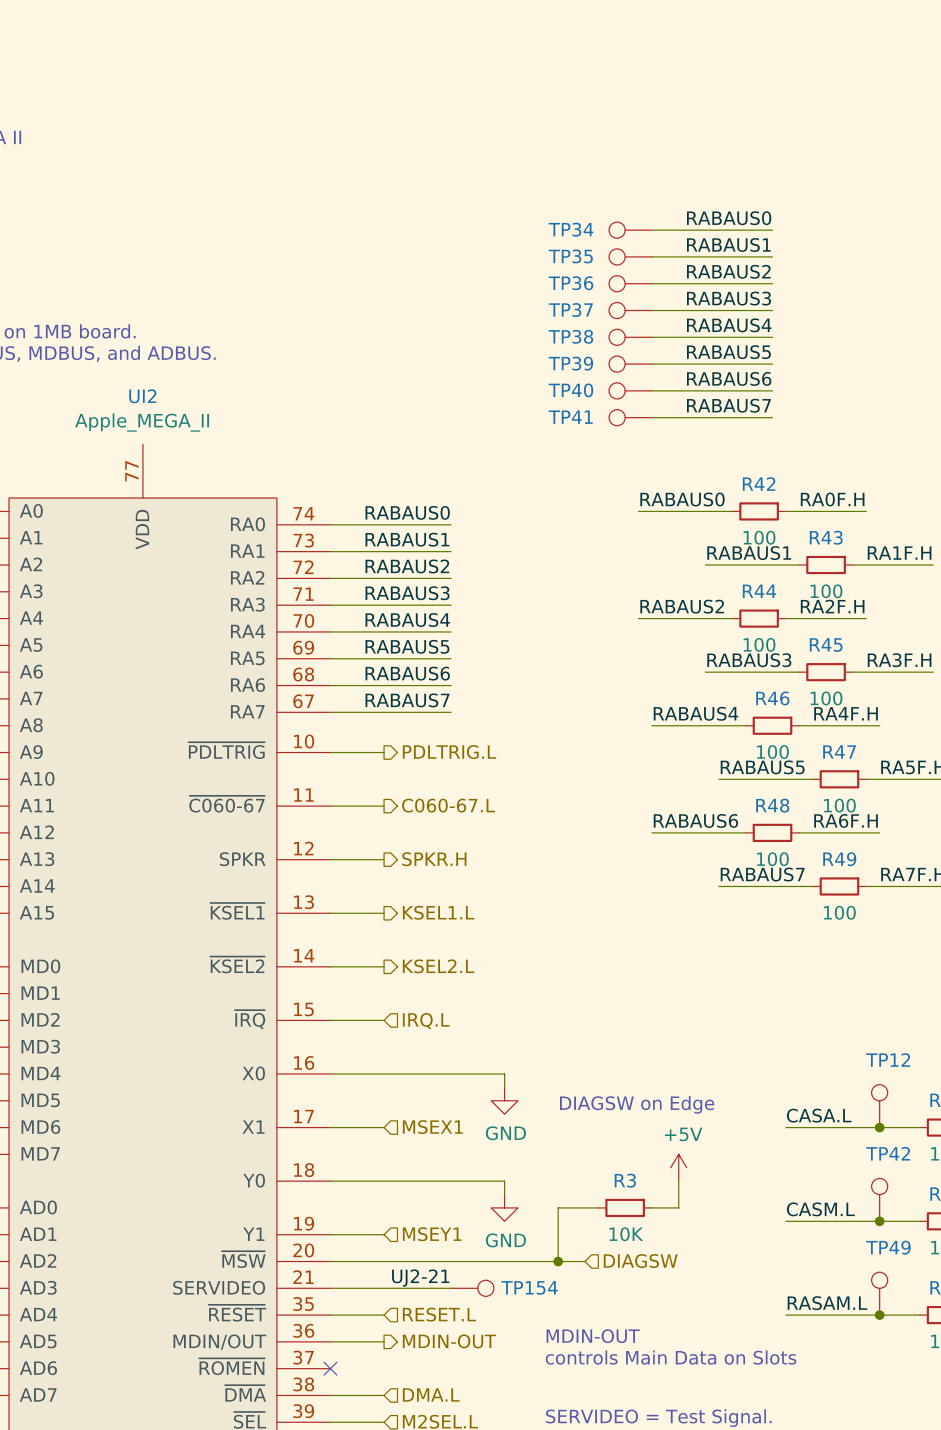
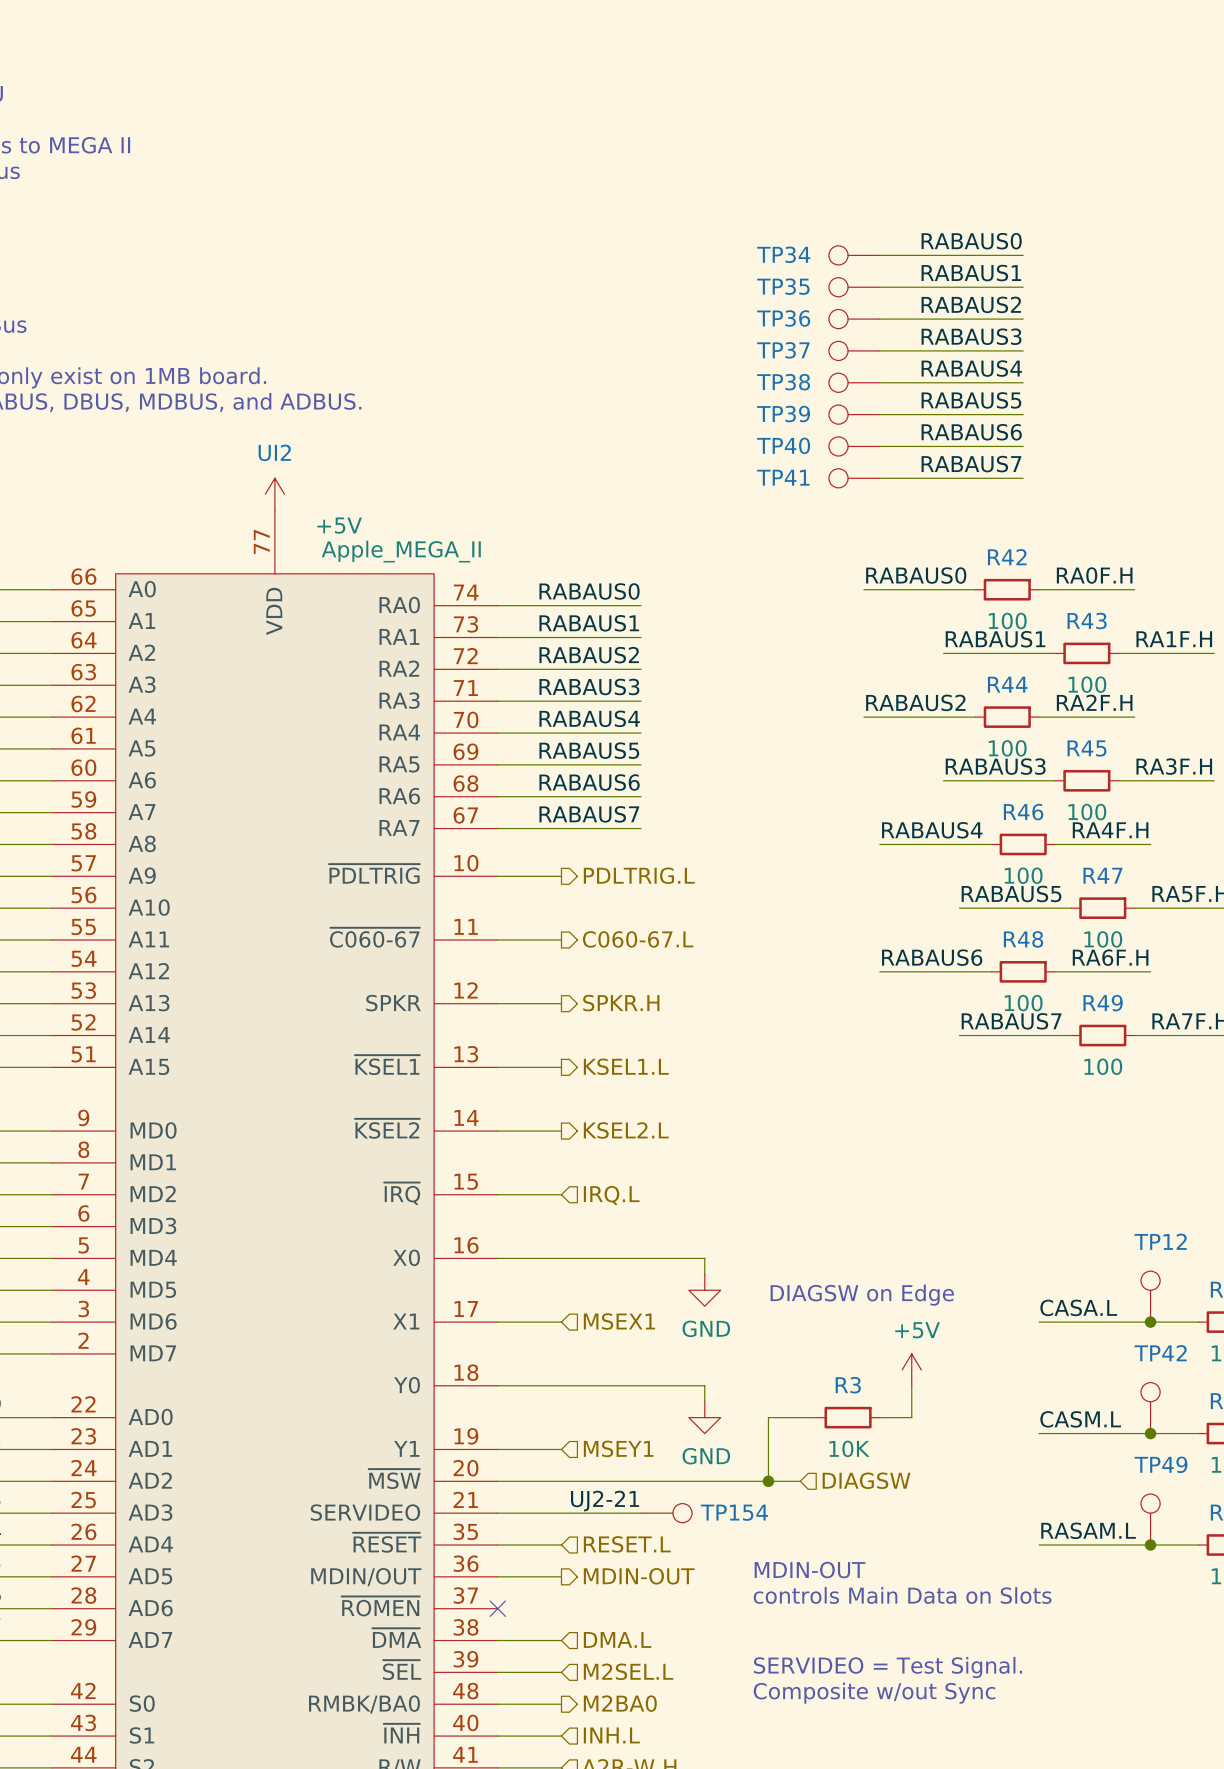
UI2 value position: Apple_MEGA_II (142, 422) -> Apple_MEGA_II (401, 551)
power symbol: none -> +5V (274, 494)

